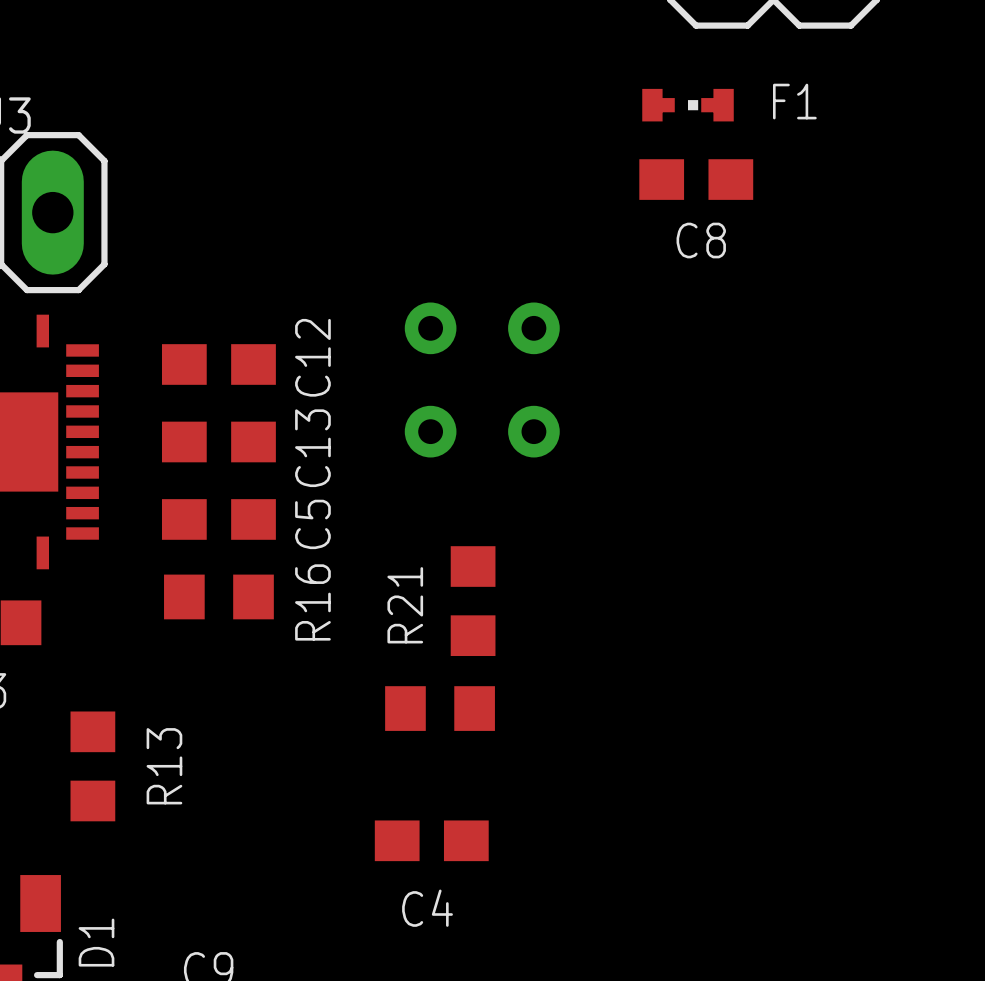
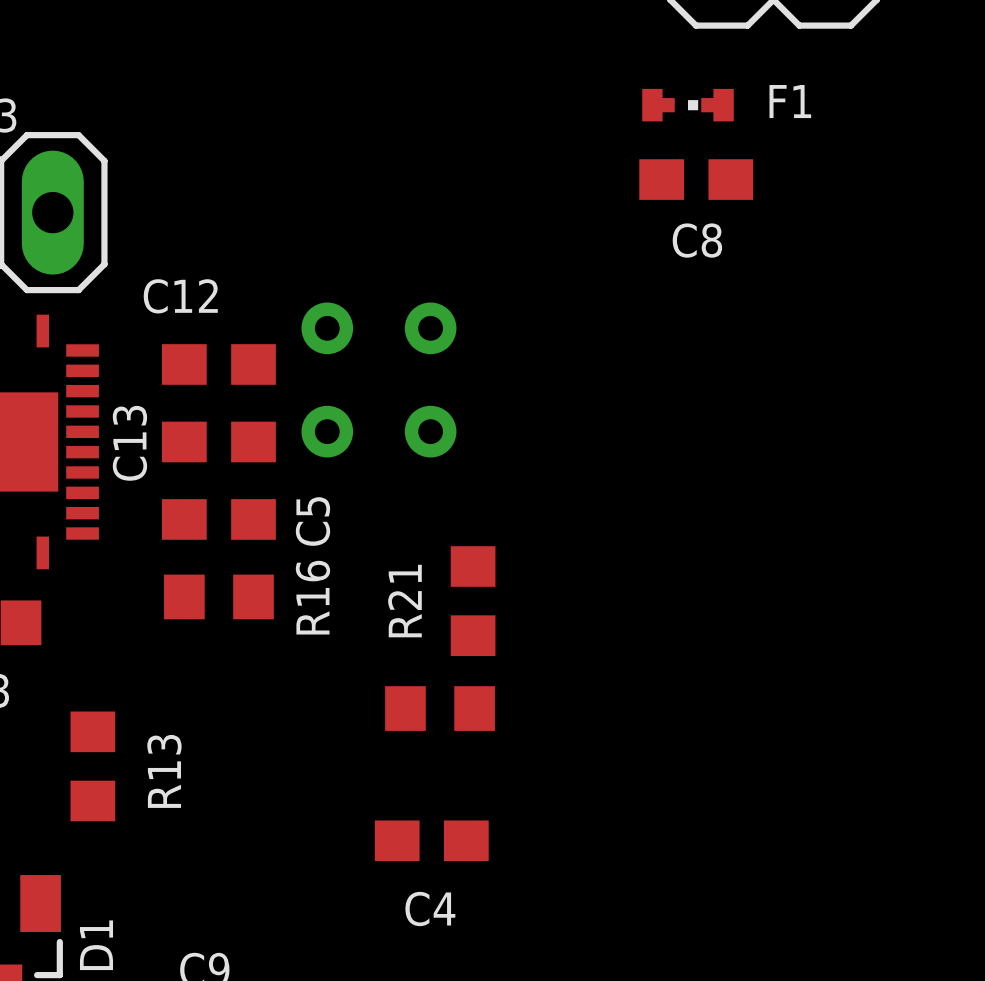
C12 name rotation: 0° (312, 357) -> 90° clockwise (180, 296)
C12 name position: C12 (312, 357) -> C12 (180, 296)
part position: (482, 379) -> (378, 379)
C13 name position: C13 (312, 448) -> C13 (129, 443)

